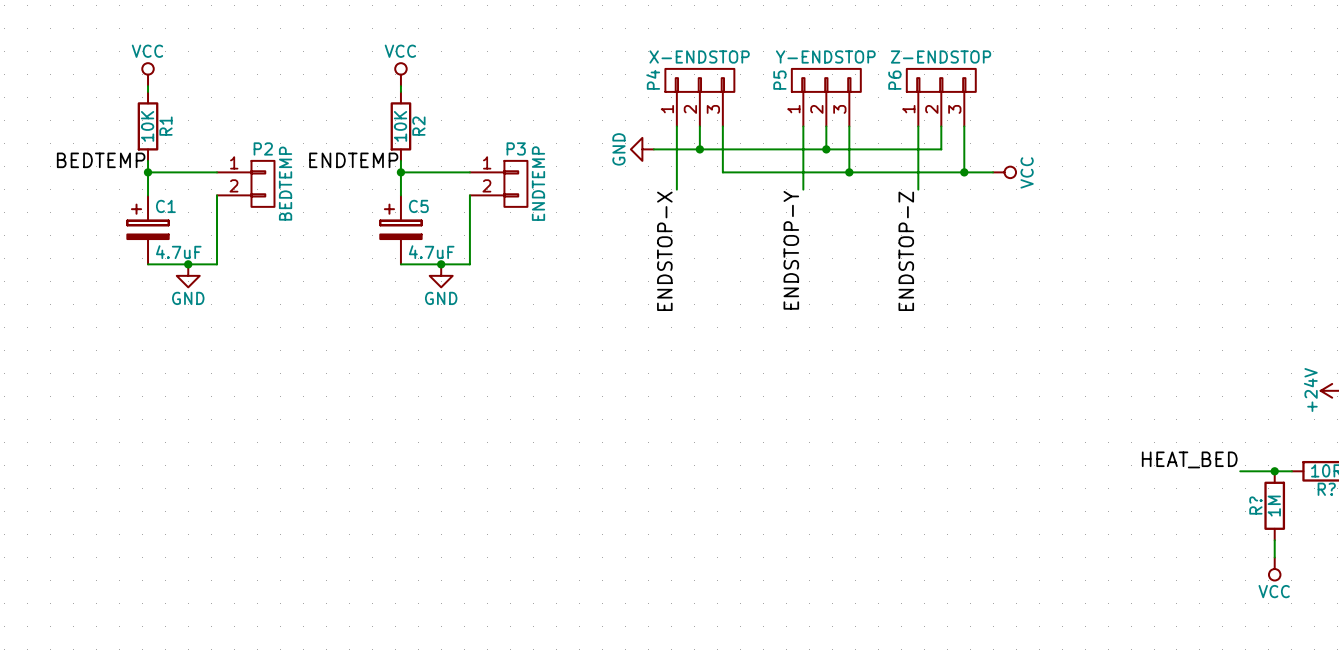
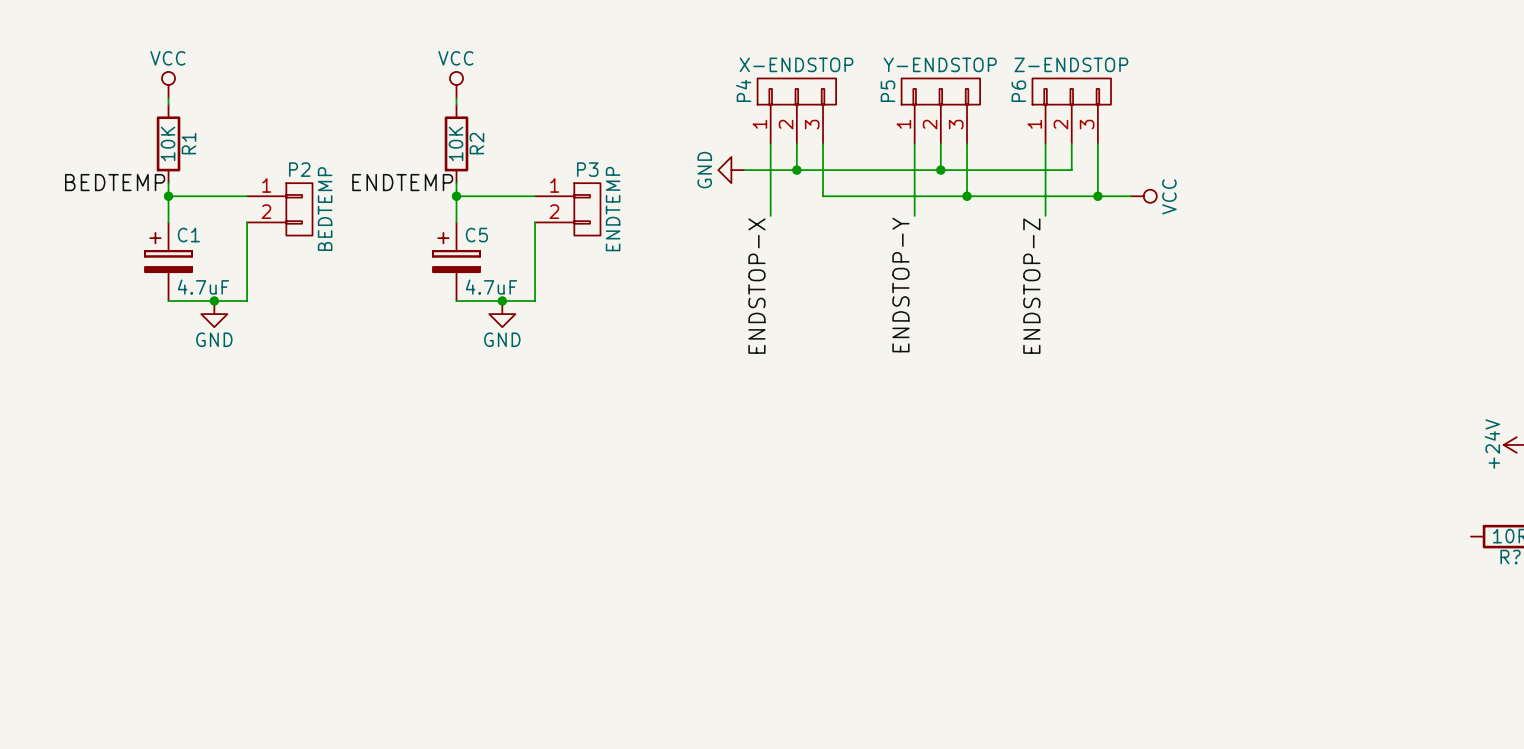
label: HEAT_BED (1189, 459) -> none
wire: (1240, 471) (1291, 471) -> none
junction: (1274, 471) -> none
R?: 1M (1274, 505) -> none
wire: (1274, 540) (1274, 557) -> none
power symbol: VCC (1274, 569) -> none

